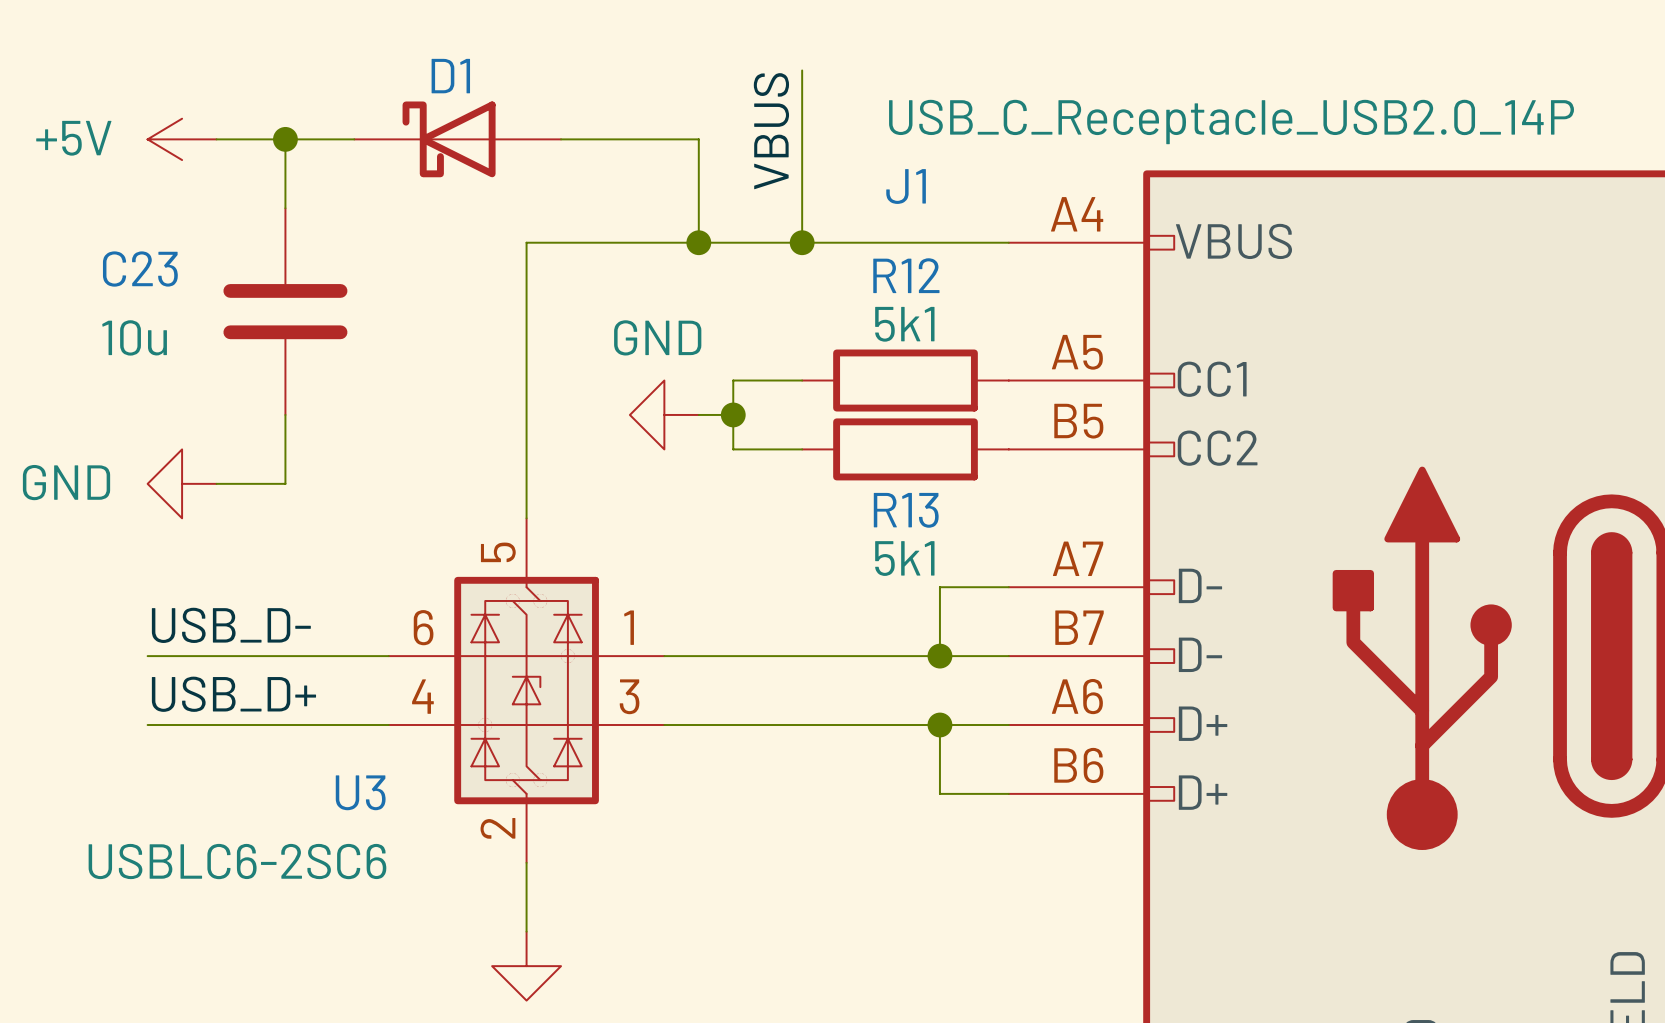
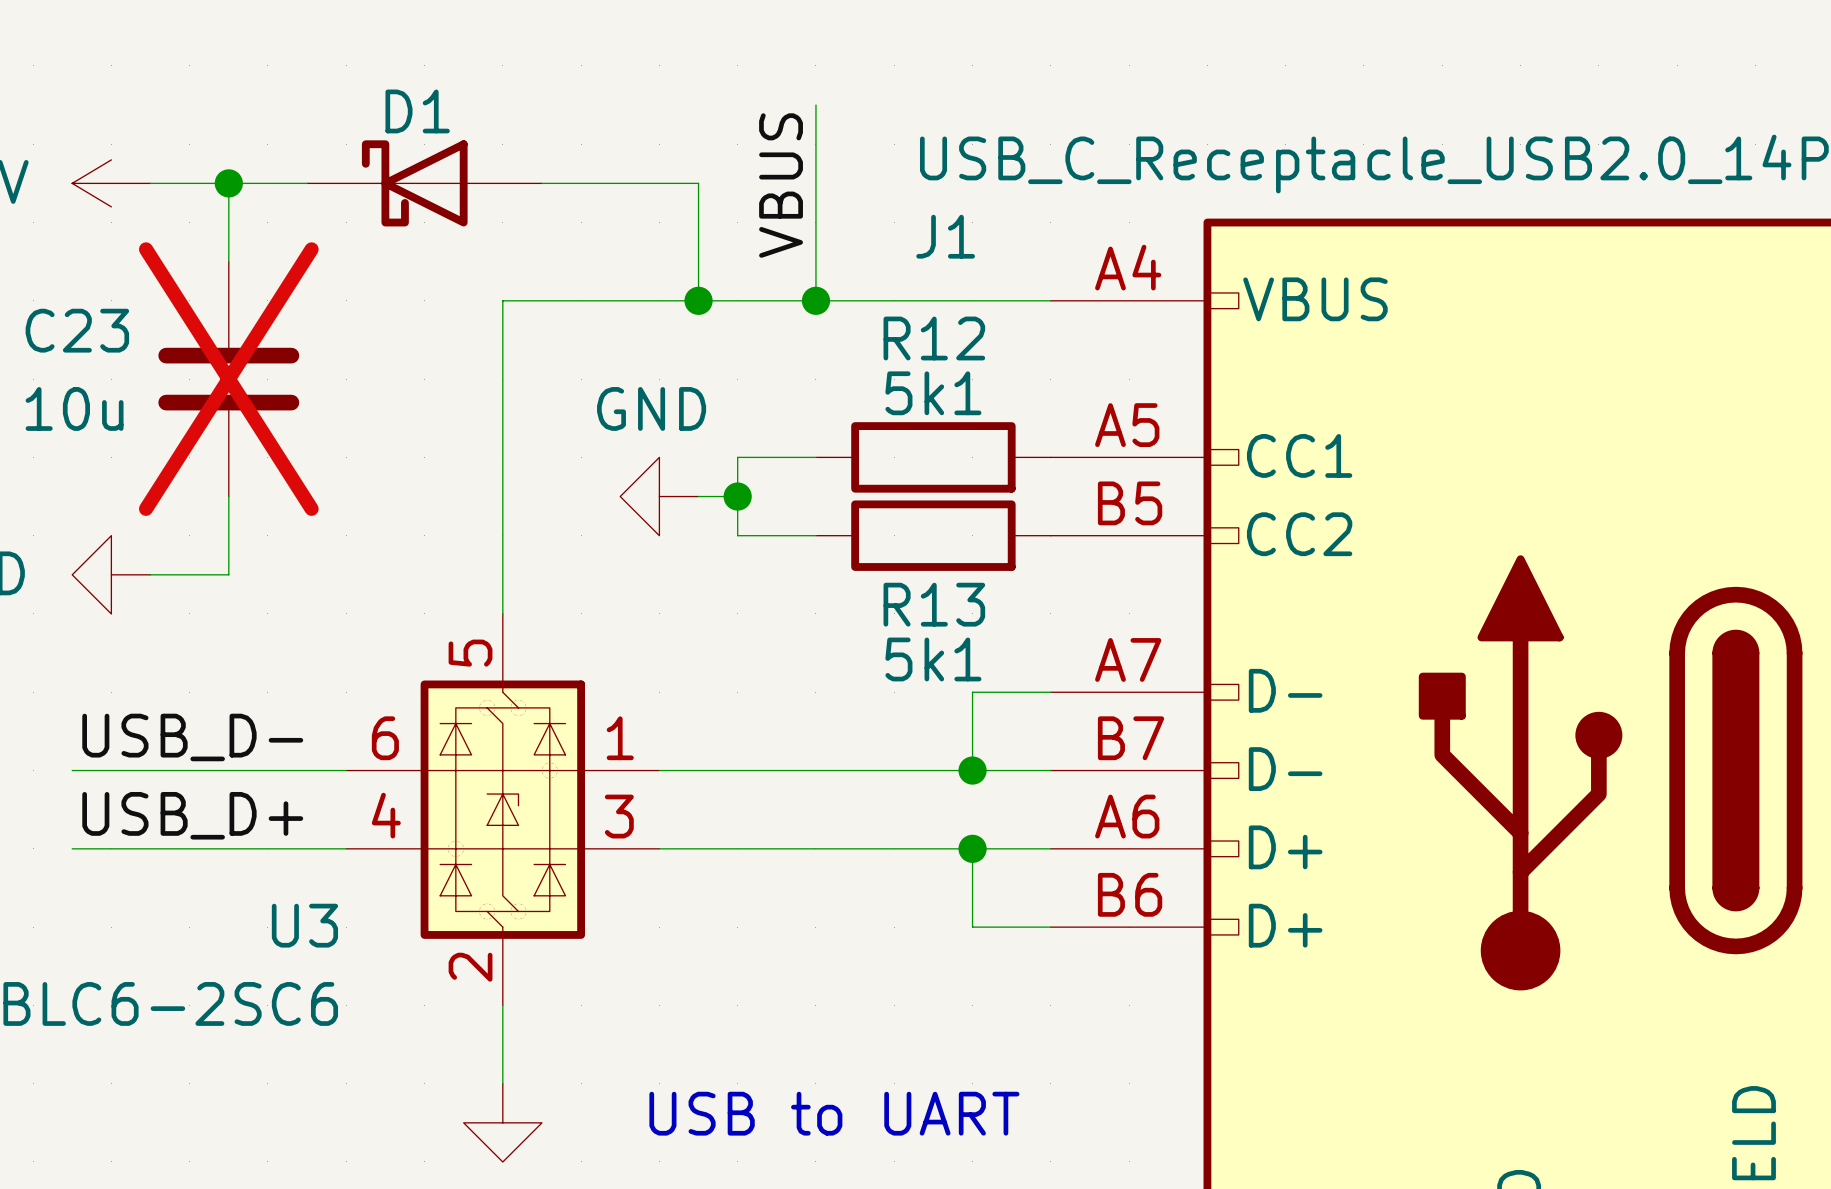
C23 do-not-place cross: none -> (228, 379)
text: none -> USB to UART (834, 1113)

